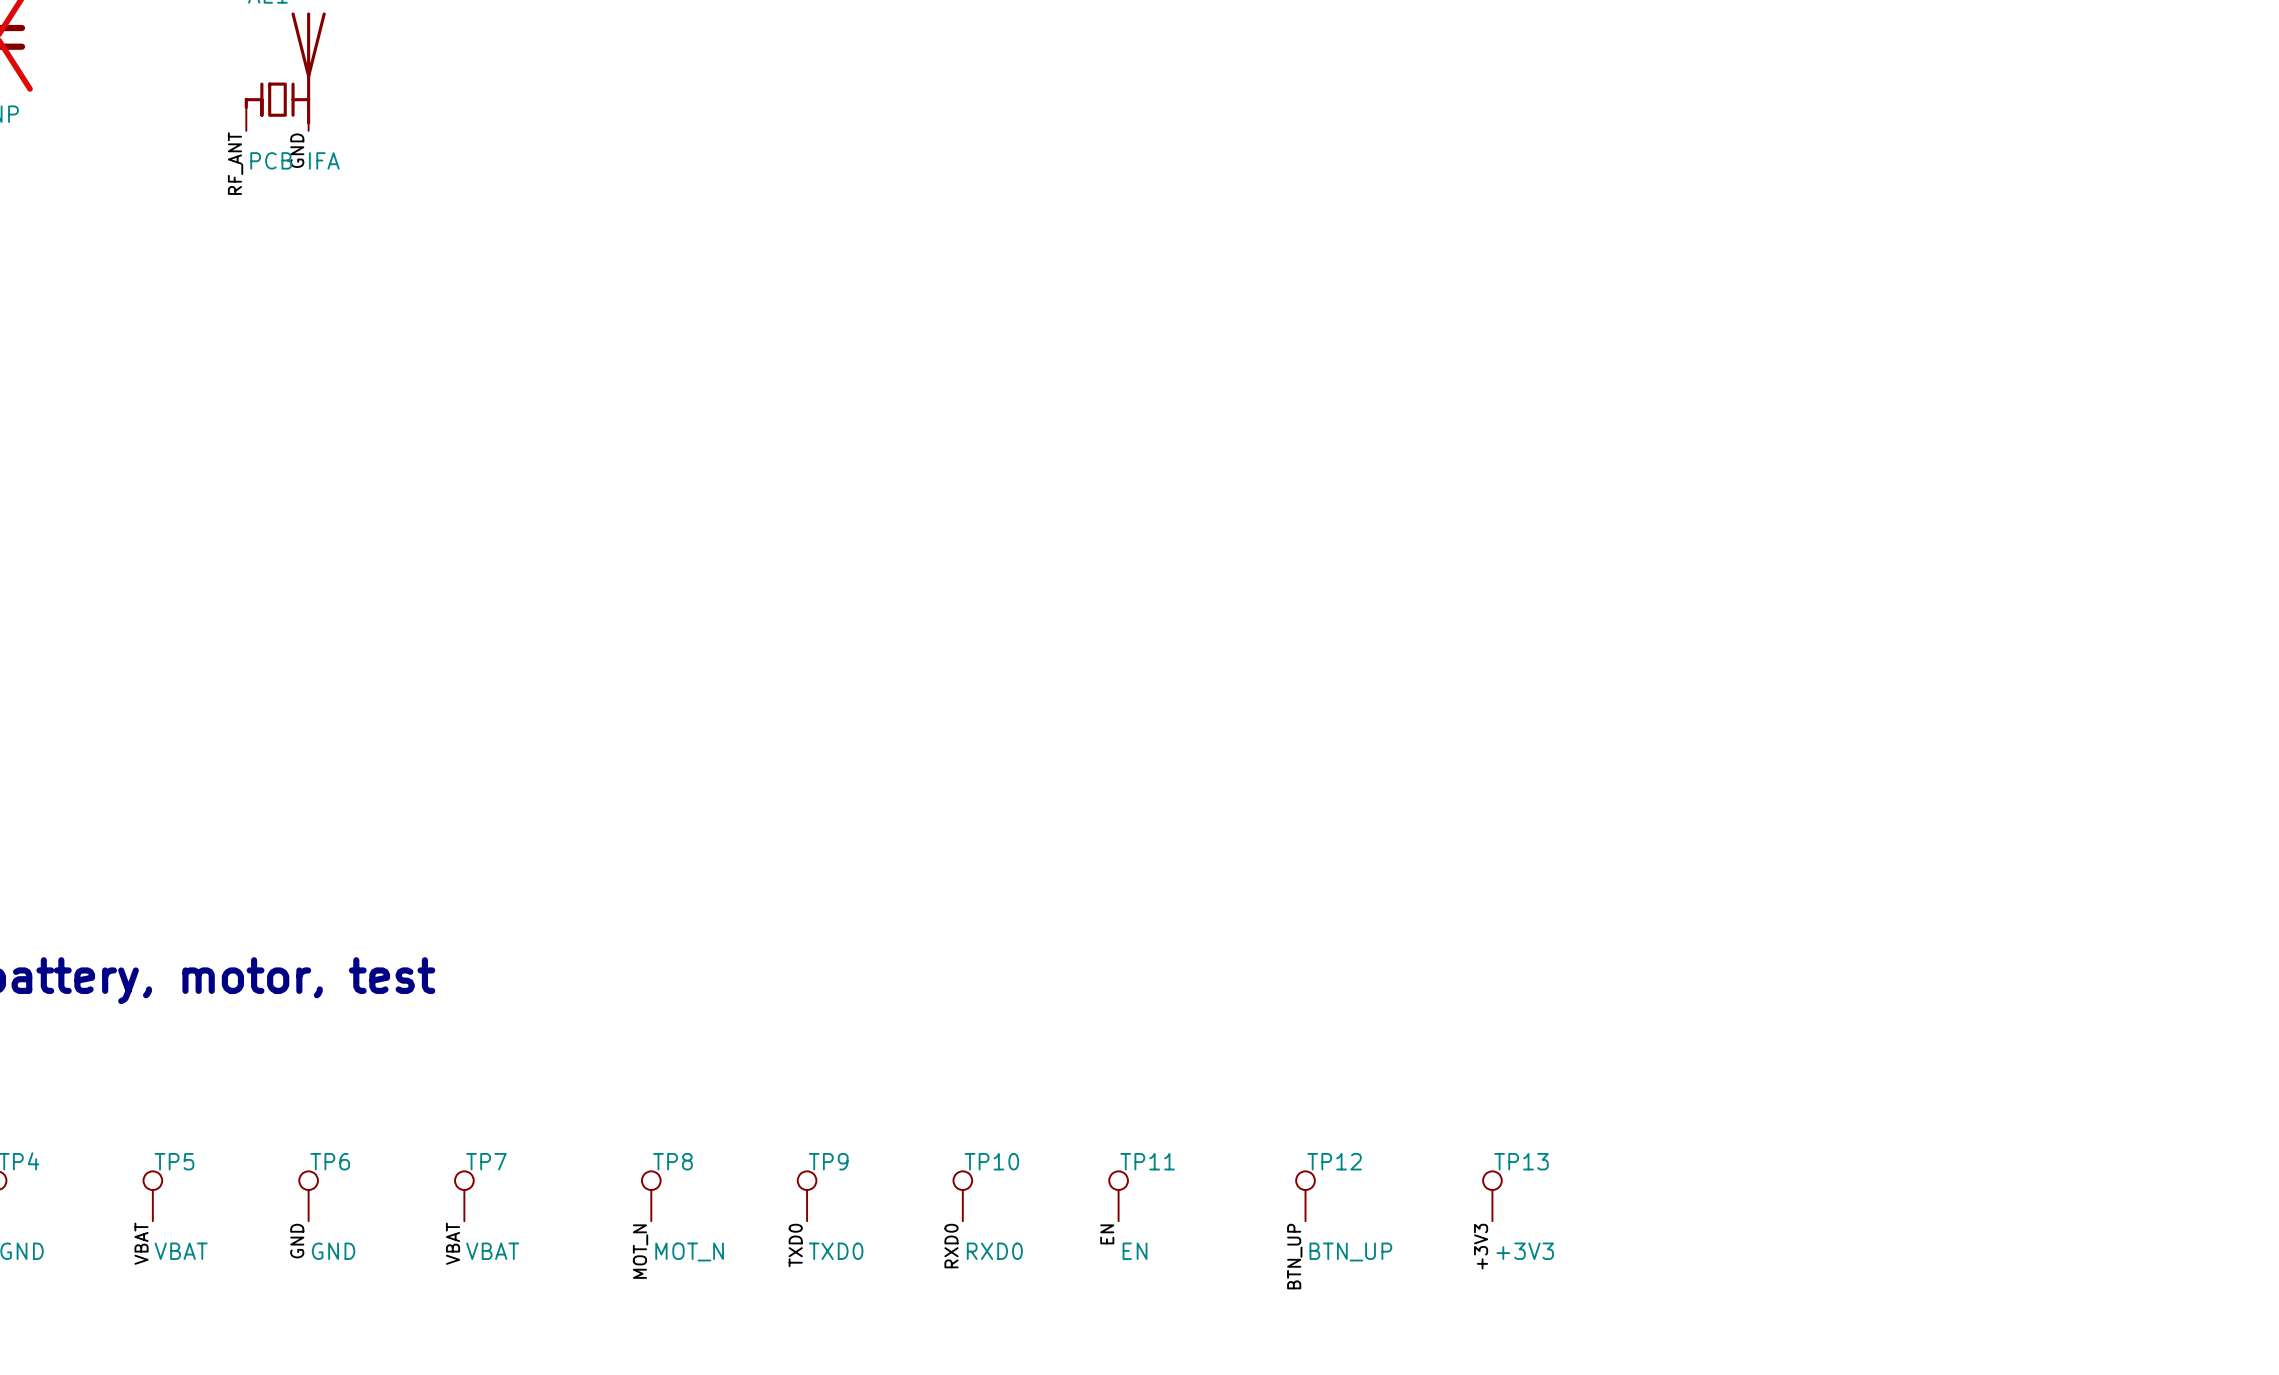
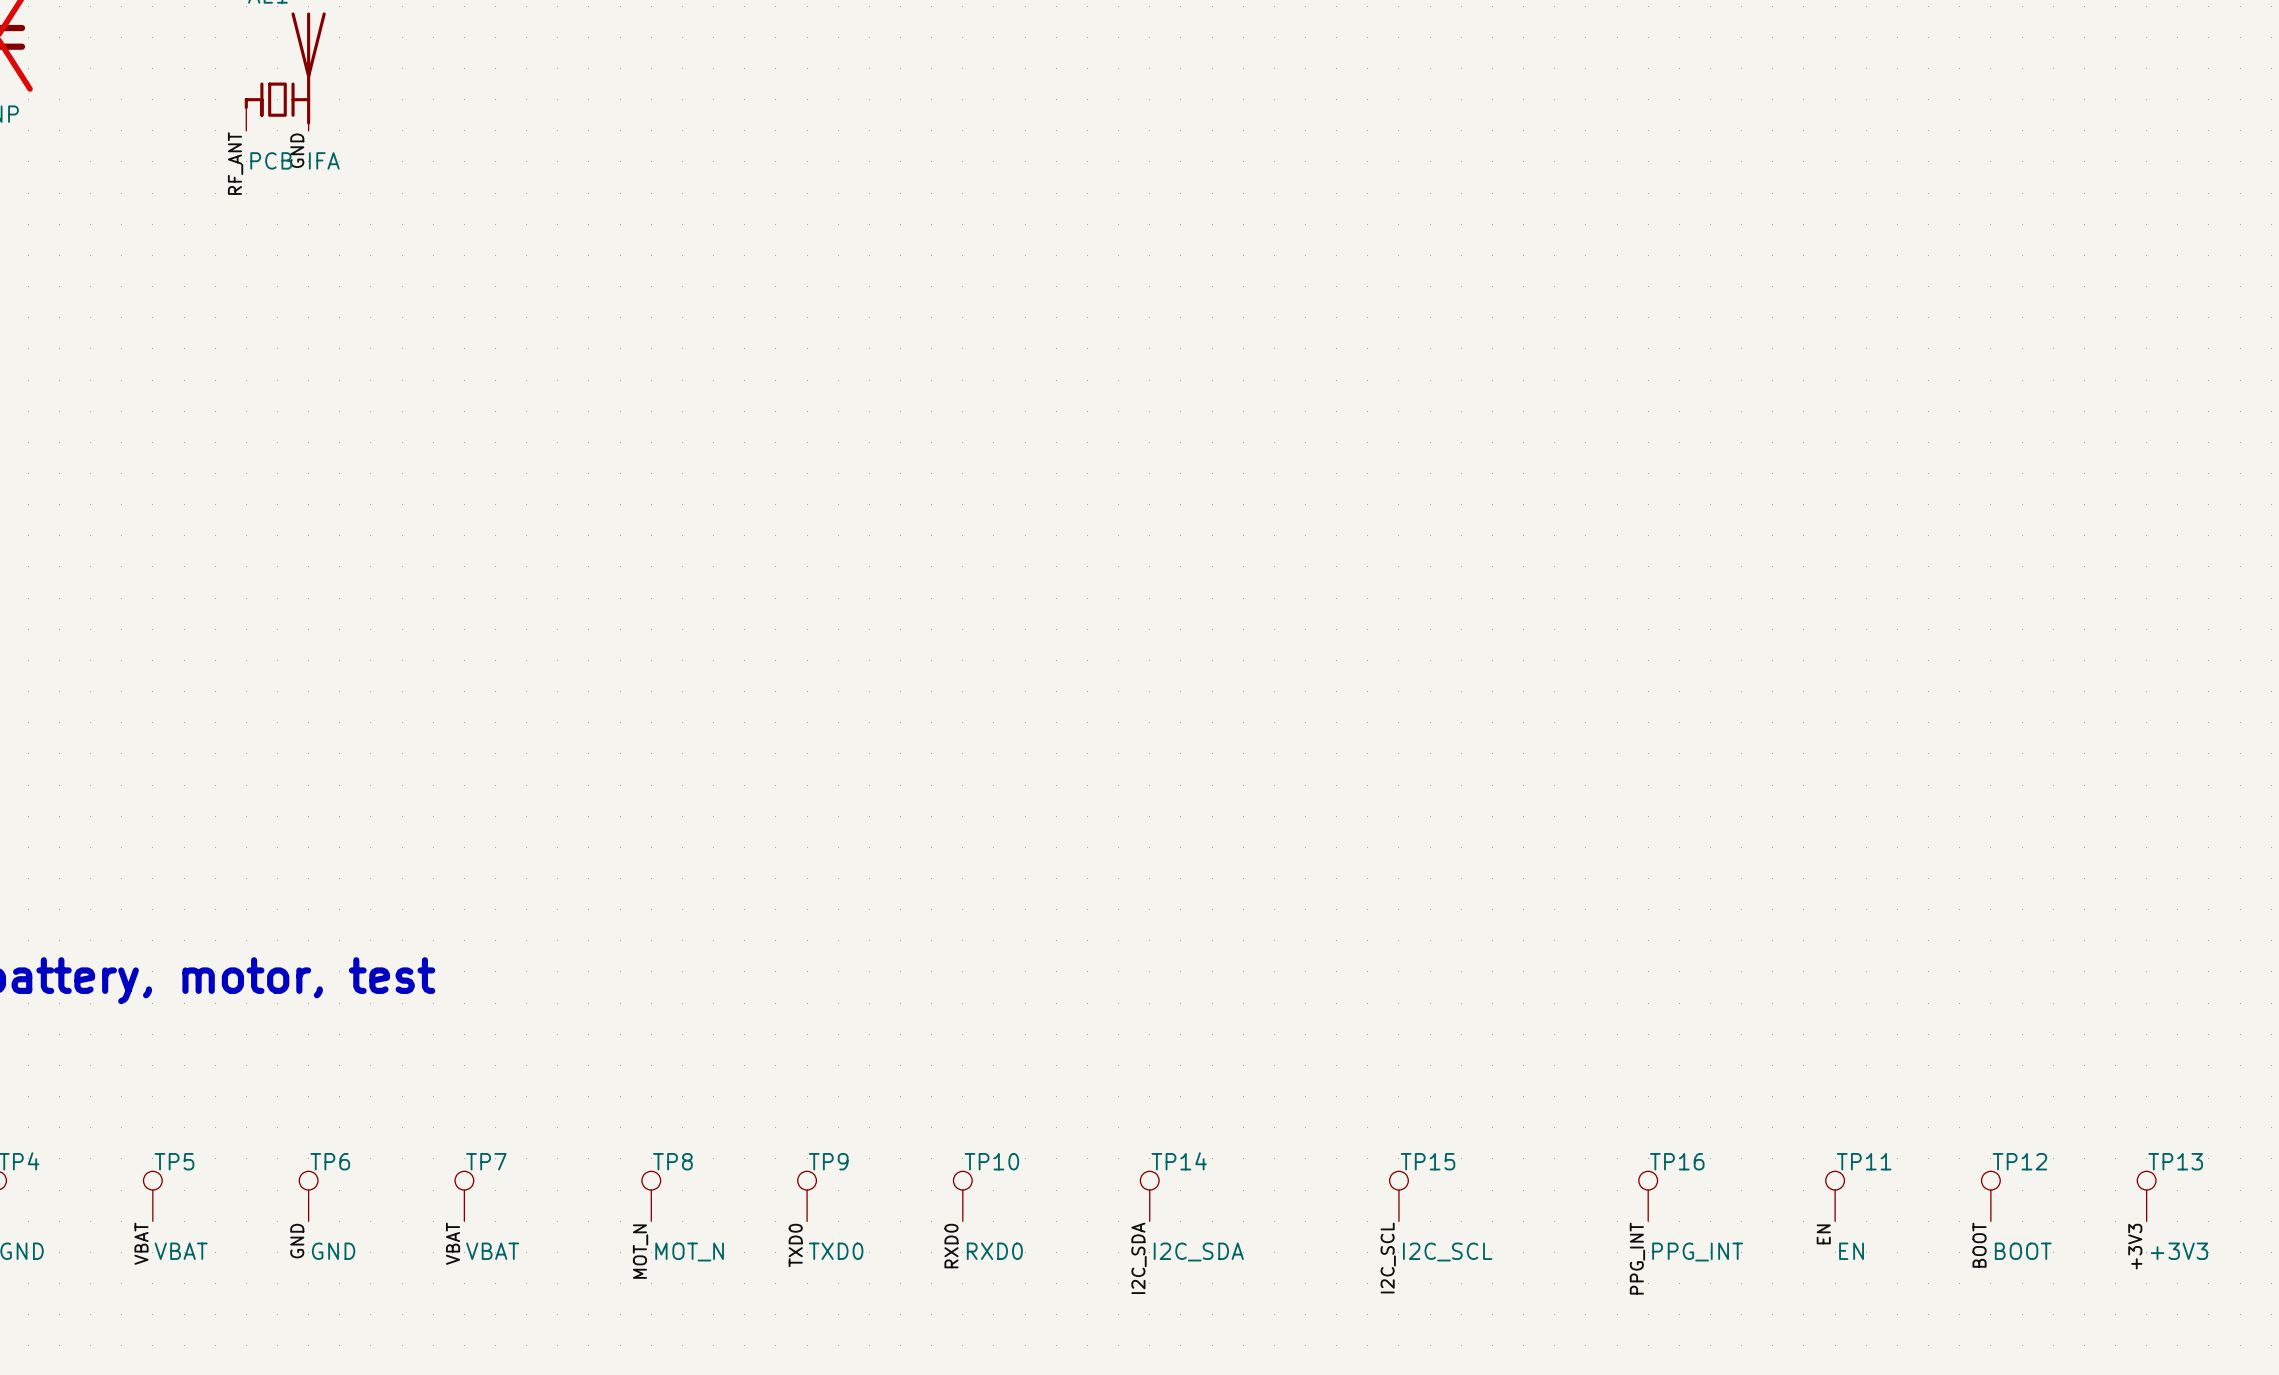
TP11 position: (1118, 1196) -> (1835, 1196)
TP14: none -> I2C_SDA (1149, 1196)
TP12 position: (1305, 1196) -> (1990, 1196)
TP15: none -> I2C_SCL (1398, 1196)
TP13 position: (1492, 1196) -> (2146, 1196)
TP16: none -> PPG_INT (1648, 1196)
label: EN (1107, 1234) -> none
label: none -> EN (1823, 1234)
label: none -> BOOT (1979, 1245)
label: +3V3 (1481, 1246) -> none
label: none -> +3V3 (2135, 1246)
TP12 value: BTN_UP (1350, 1251) -> BOOT (2023, 1251)
label: BTN_UP (1294, 1256) -> none
label: none -> I2C_SDA (1138, 1258)
label: none -> I2C_SCL (1388, 1258)
label: none -> PPG_INT (1637, 1258)

